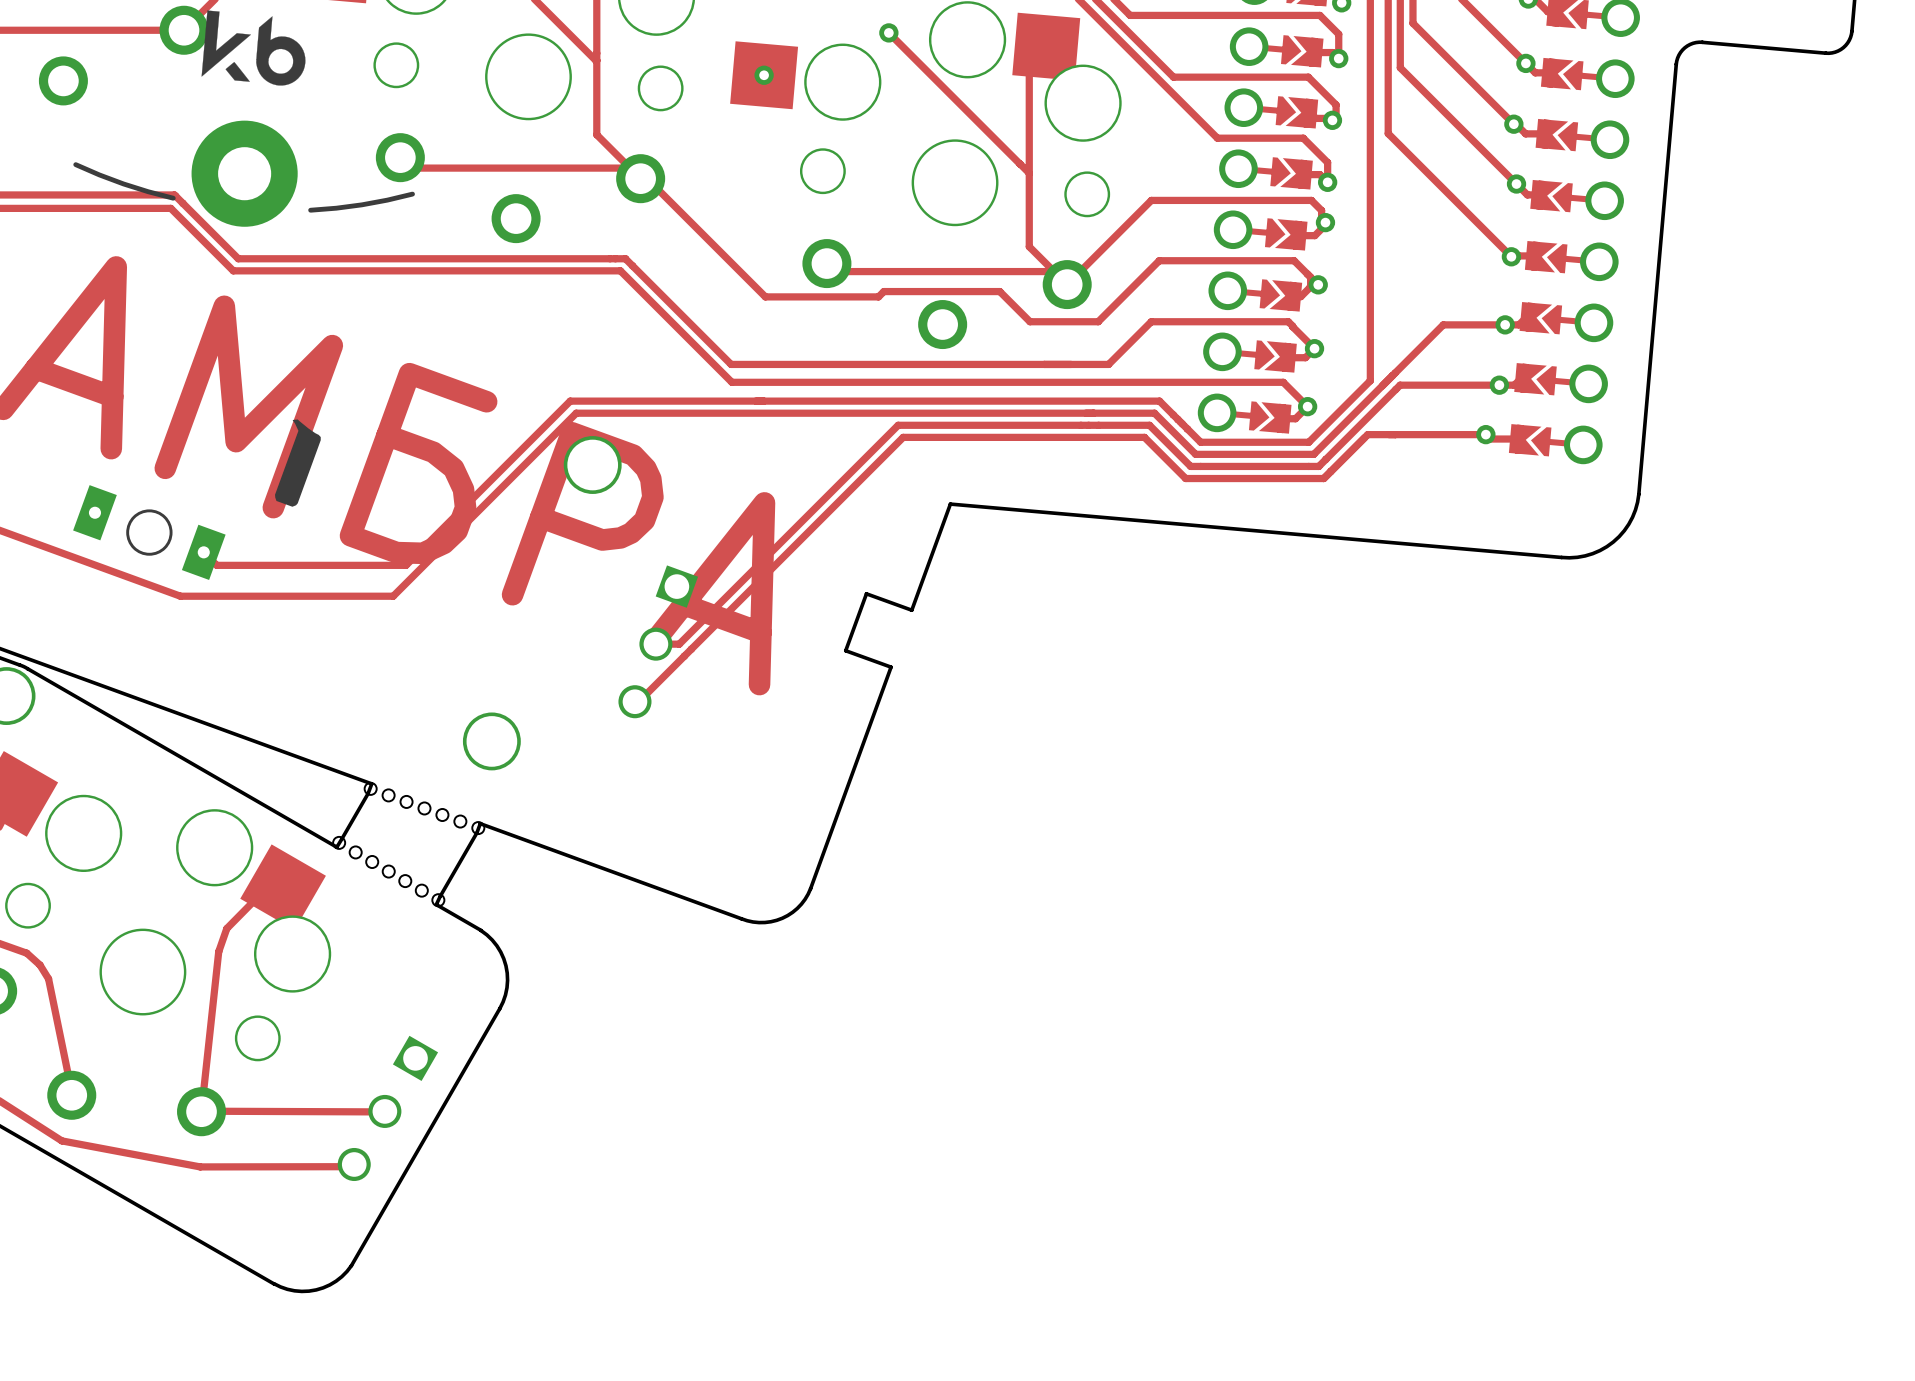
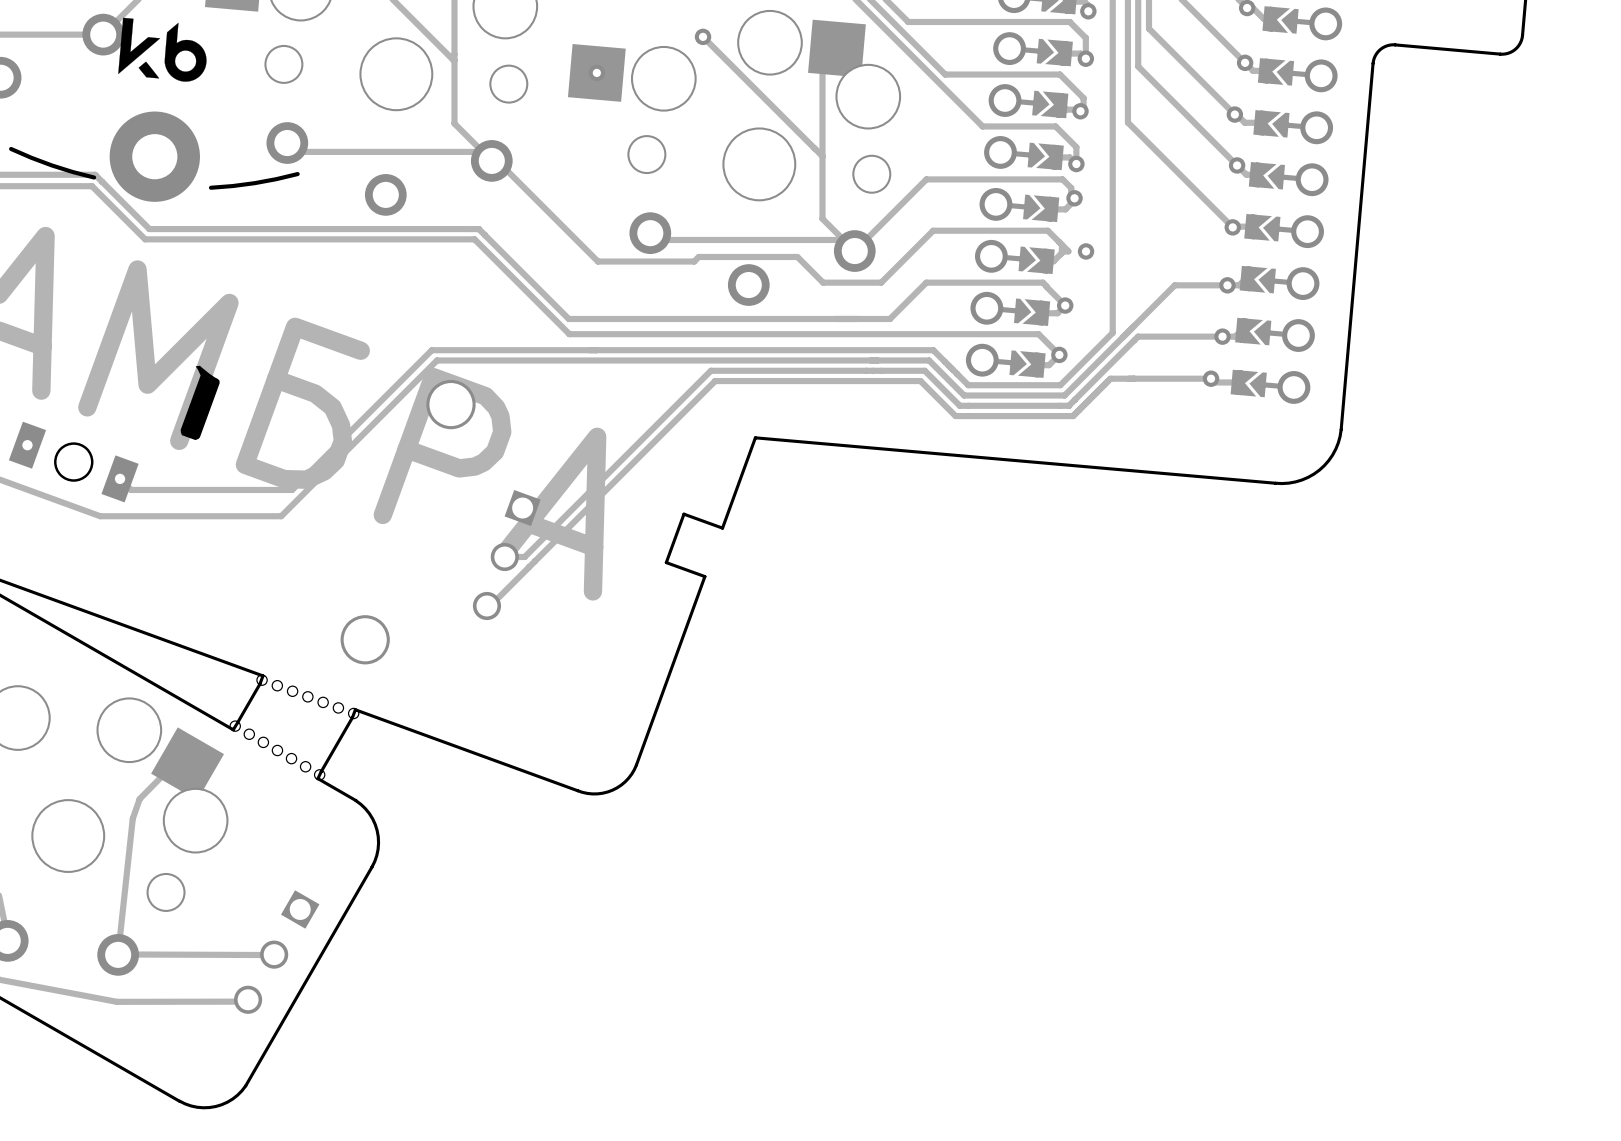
via position: (1318, 284) -> (1086, 251)

